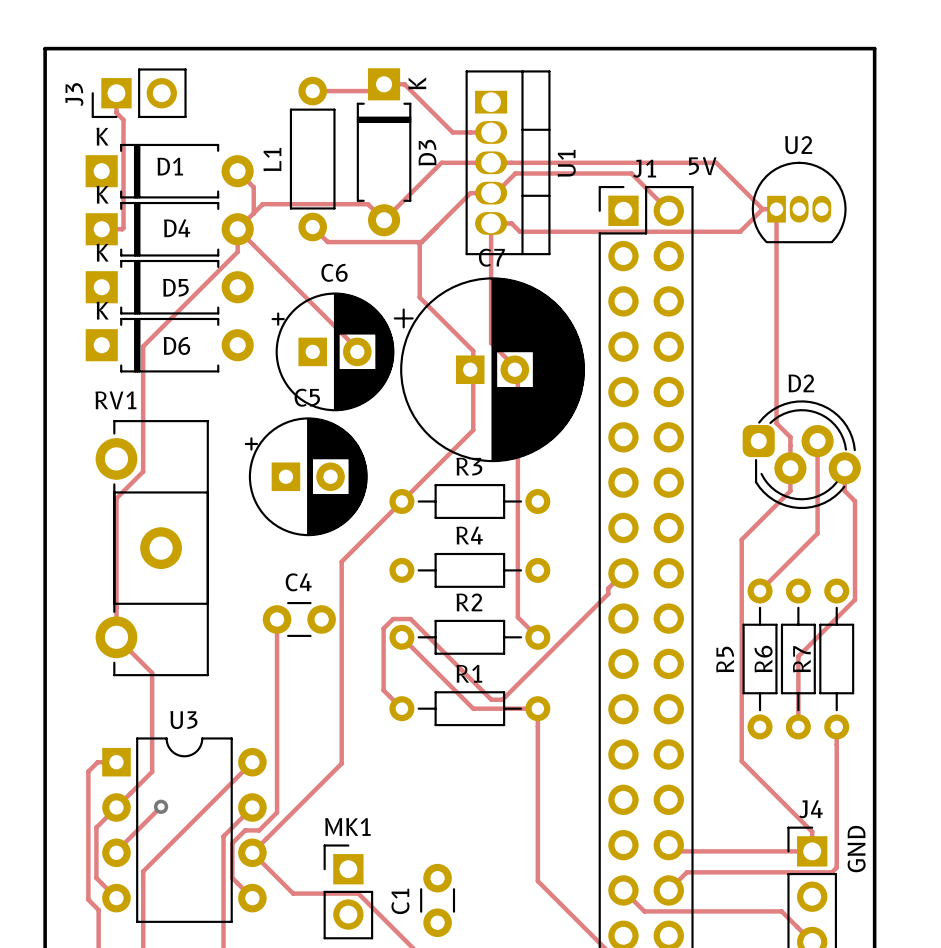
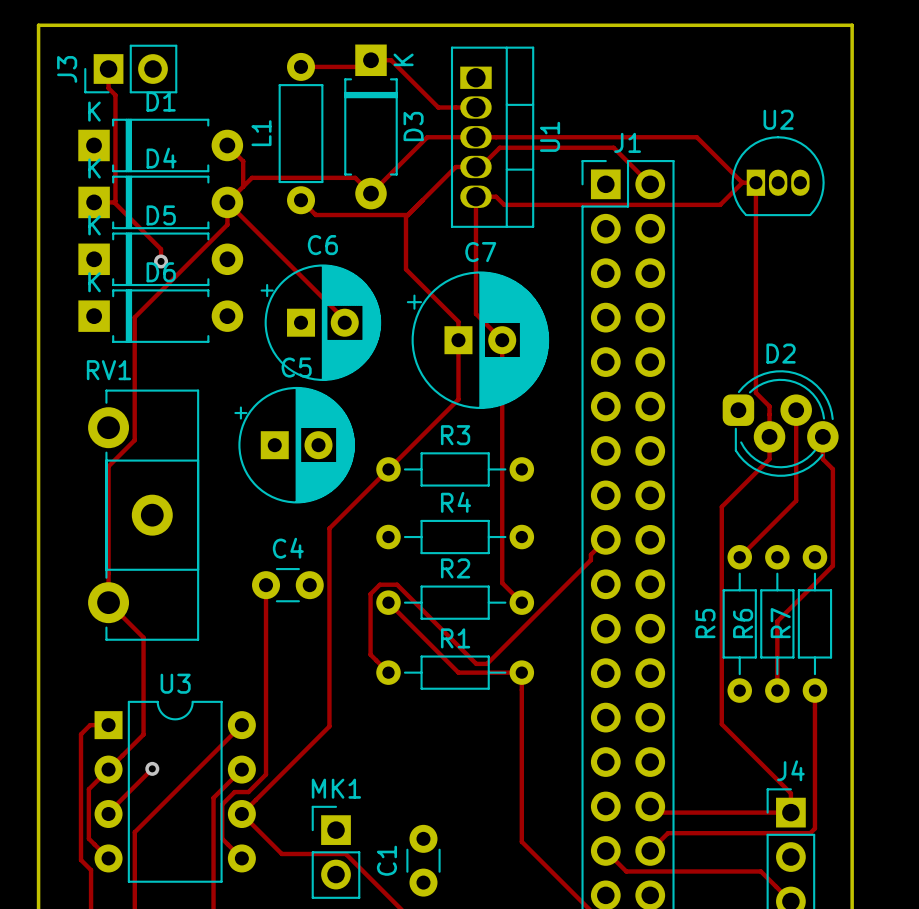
D1 name position: D1 (170, 166) -> D1 (161, 101)
text: 5V (702, 166) -> none
D4 name position: D4 (177, 228) -> D4 (161, 158)
track: none -> (114, 202) (161, 249) (161, 261)
C7 footprint: [393, 277, 585, 463] -> [406, 271, 550, 409]
D5 name position: D5 (175, 287) -> D5 (161, 215)
via: none -> (161, 261)
D6 name position: D6 (176, 345) -> D6 (161, 272)
text: GND (856, 849) -> none

